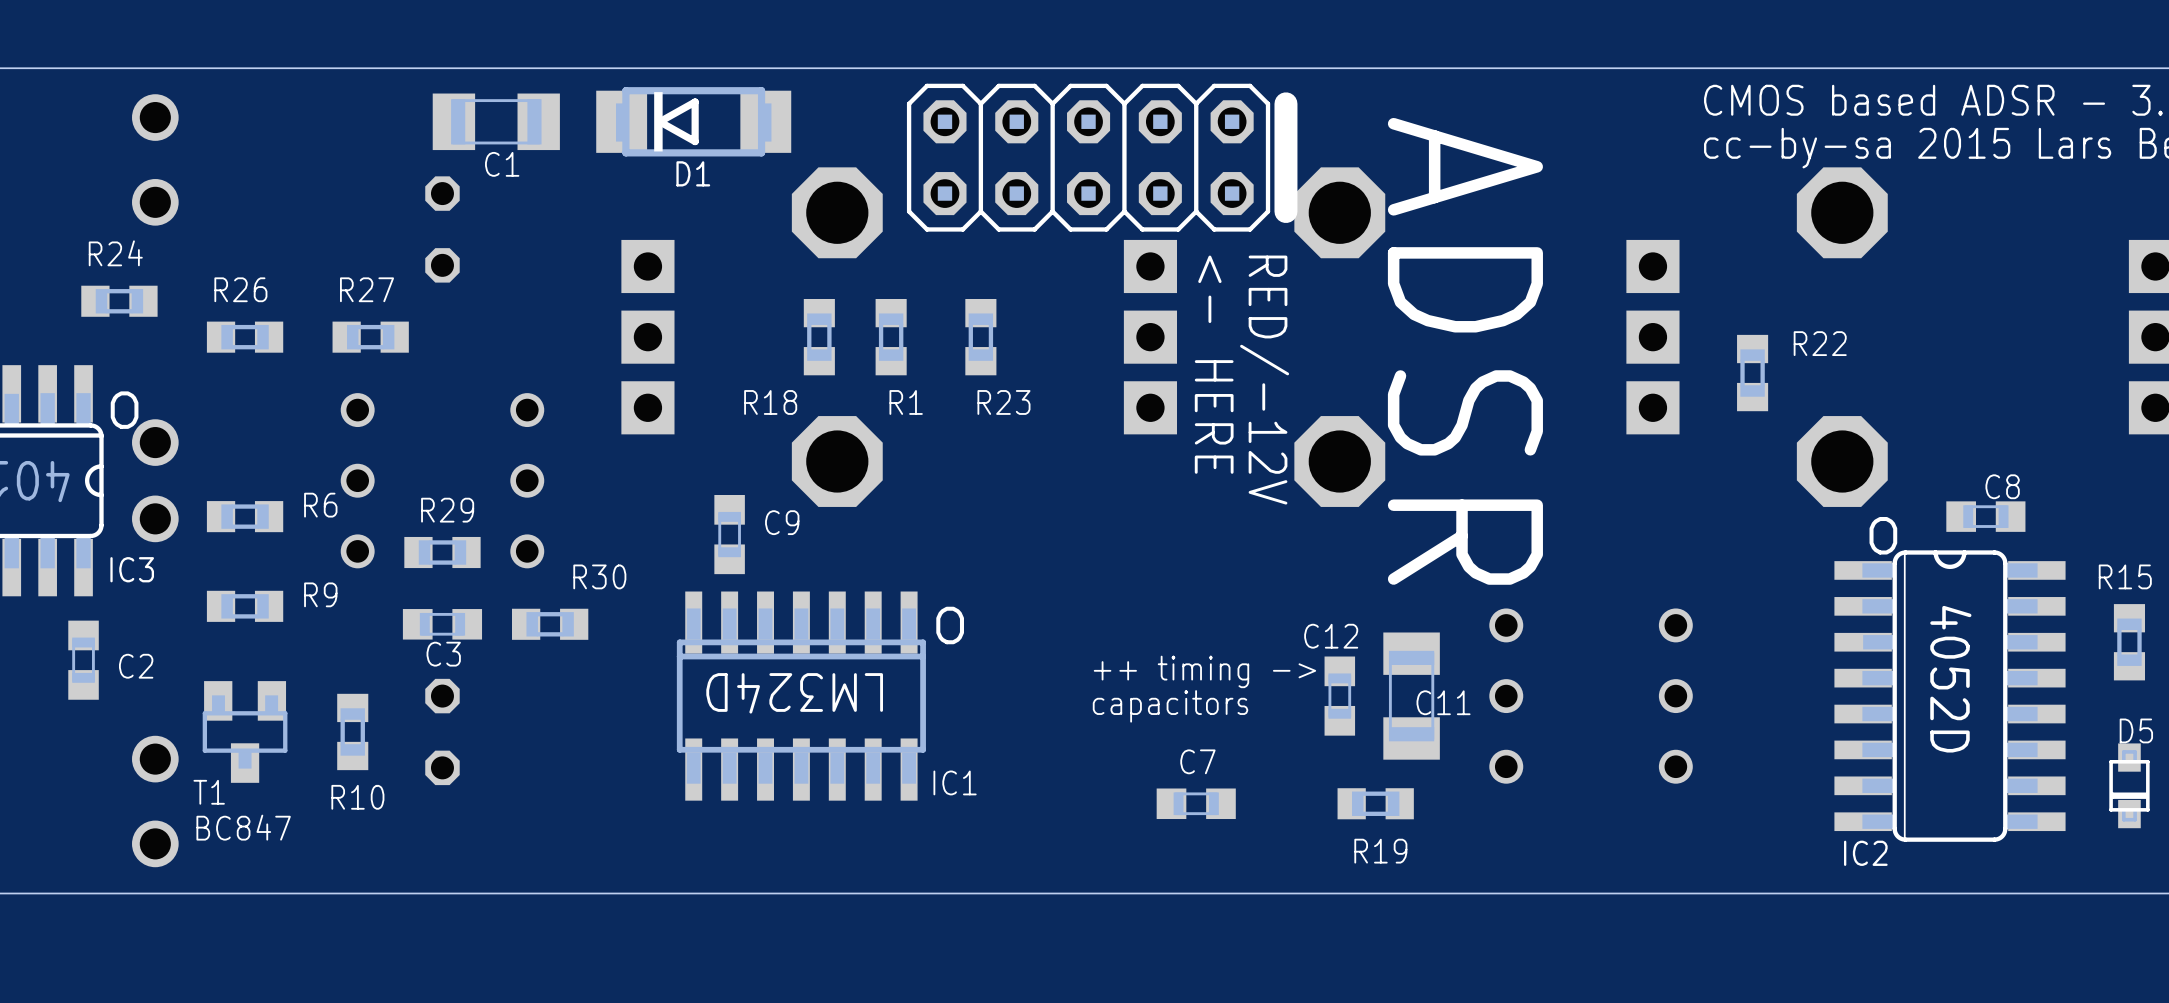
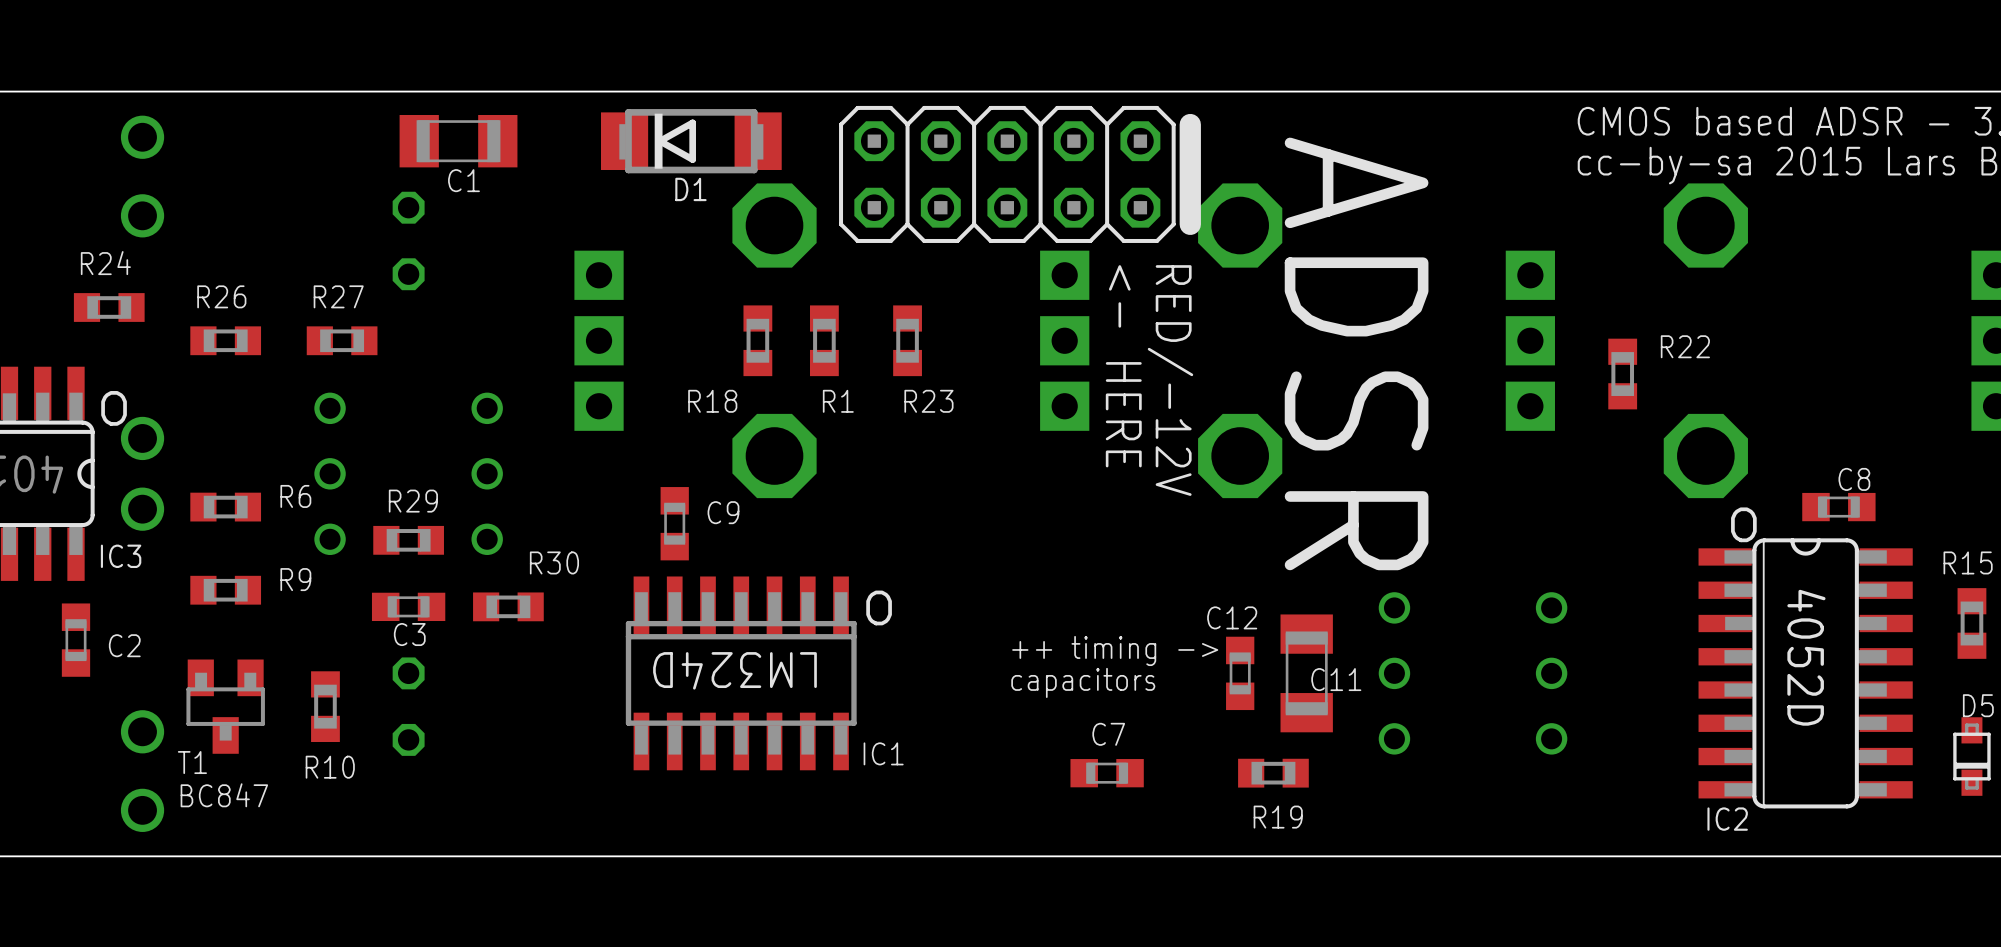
D1 position: (693, 121) -> (691, 141)

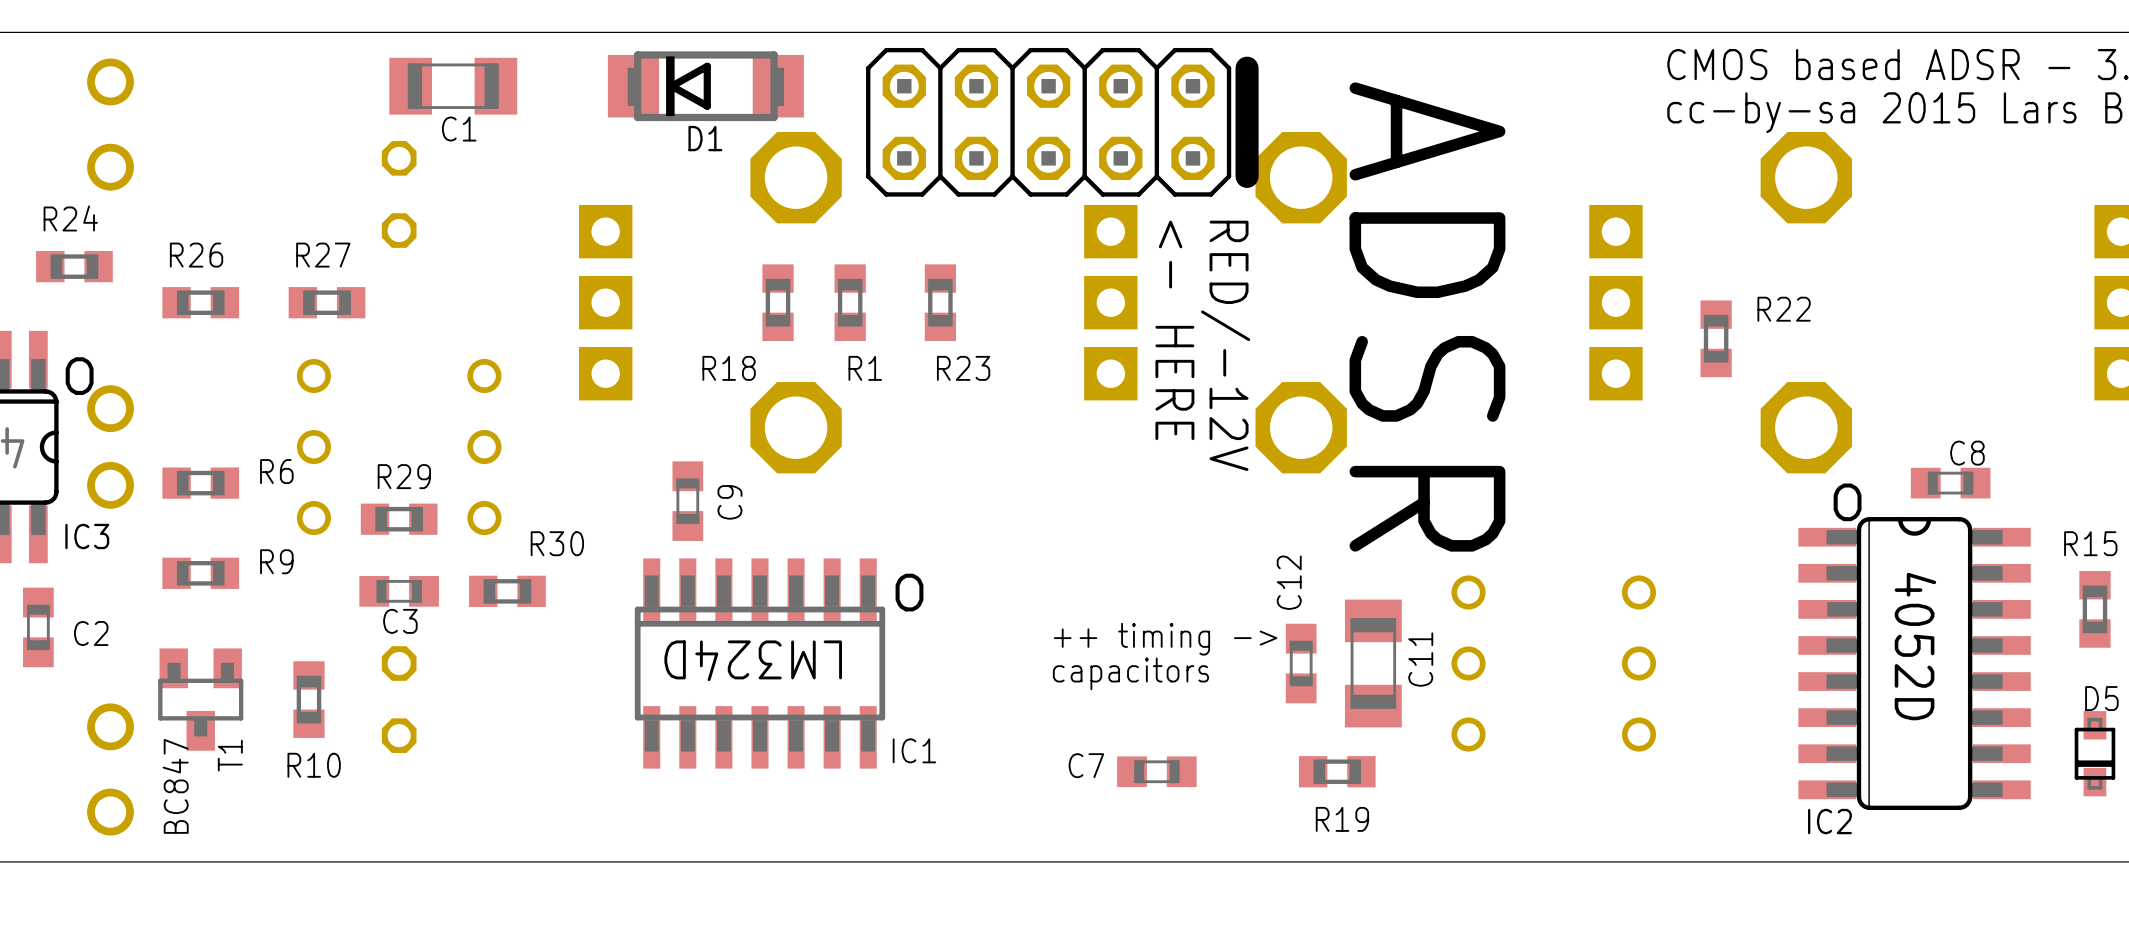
C9 name rotation: 0° (723, 512) -> 90° counterclockwise (729, 502)
C12 name rotation: 0° (1232, 617) -> 90° counterclockwise (1289, 582)
C11 name rotation: 0° (1336, 679) -> 90° counterclockwise (1420, 659)
C7 name position: C7 (1108, 734) -> C7 (1086, 765)
T1 name rotation: 0° (192, 762) -> 90° counterclockwise (230, 755)
T1 name position: T1 (192, 762) -> T1 (230, 755)
T1 value rotation: 0° (224, 795) -> 90° counterclockwise (175, 786)

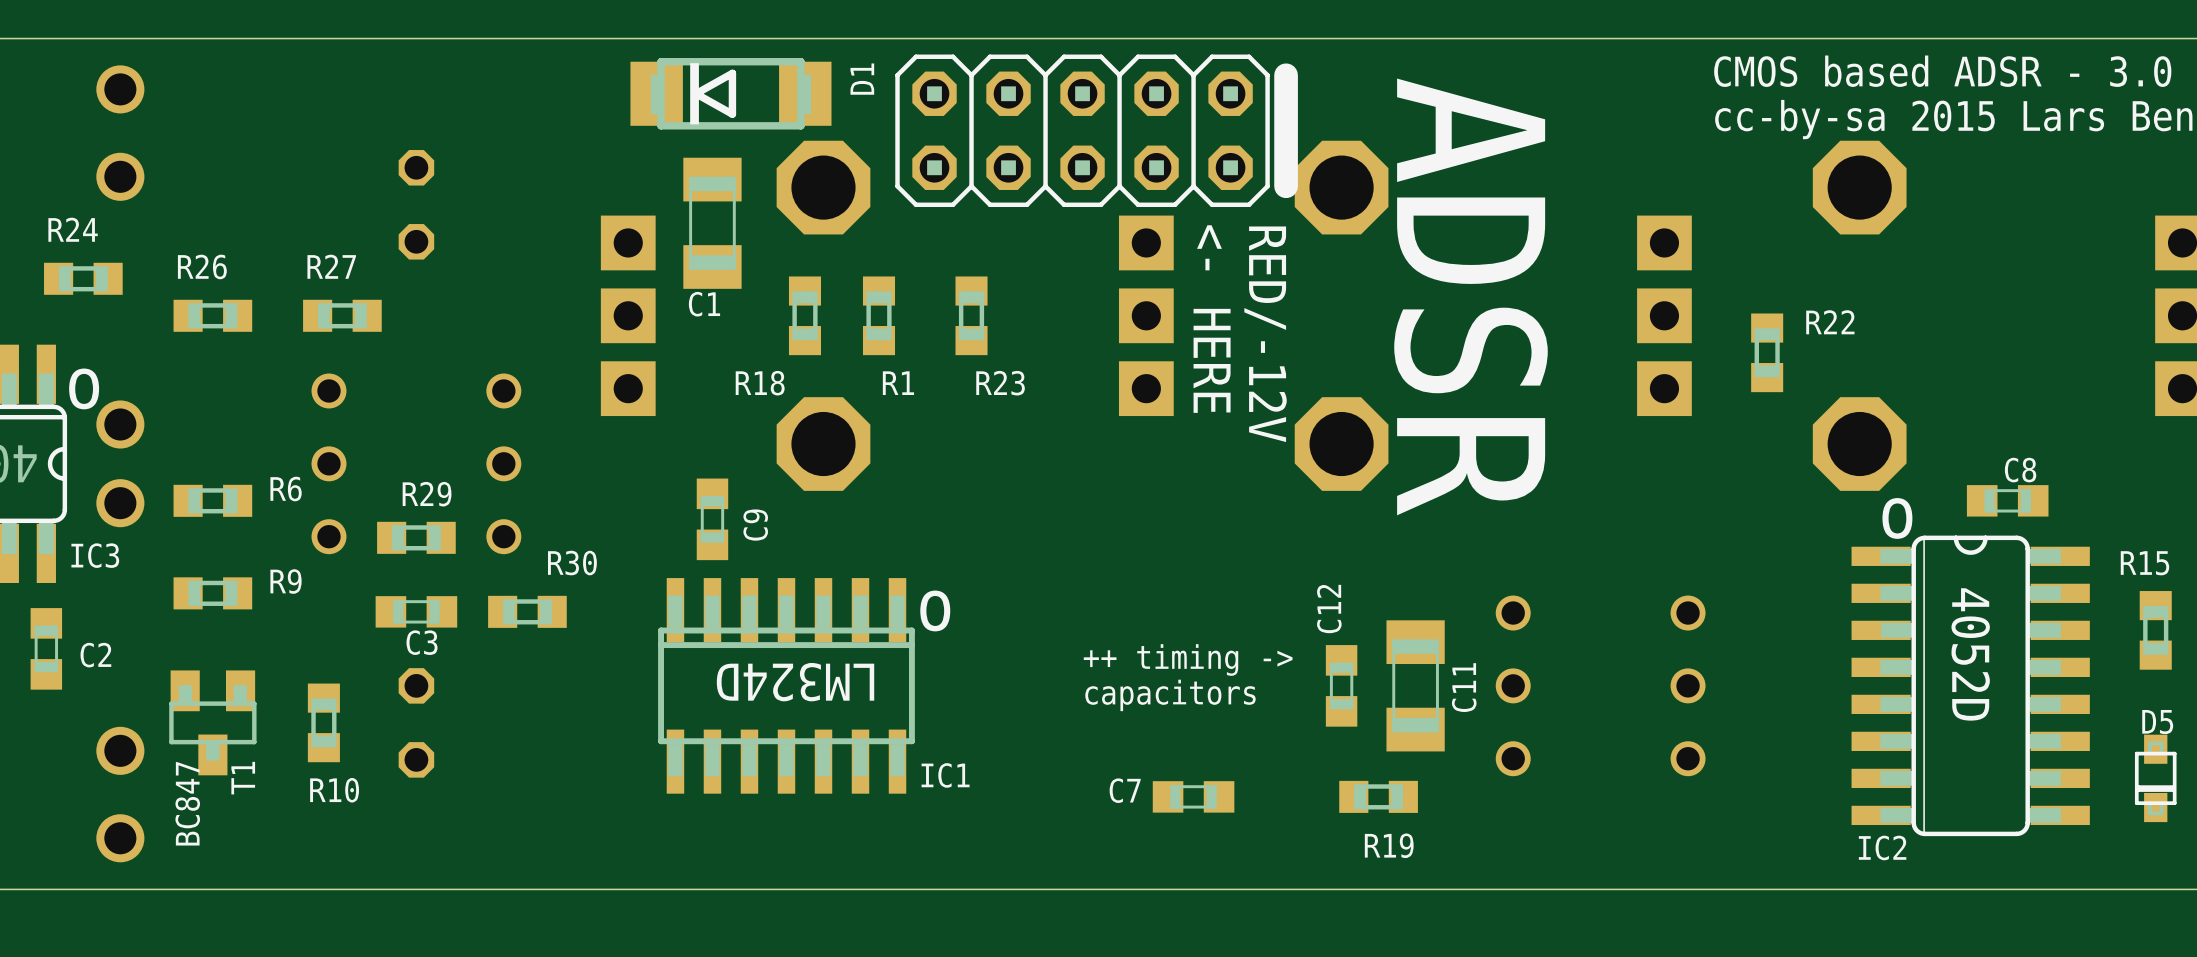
C1 rotation: 0° (453, 86) -> 90° clockwise (712, 223)
C1 position: (453, 86) -> (712, 223)
D1 name rotation: 0° (705, 138) -> 90° counterclockwise (862, 79)
D1 name position: D1 (705, 138) -> D1 (862, 79)

